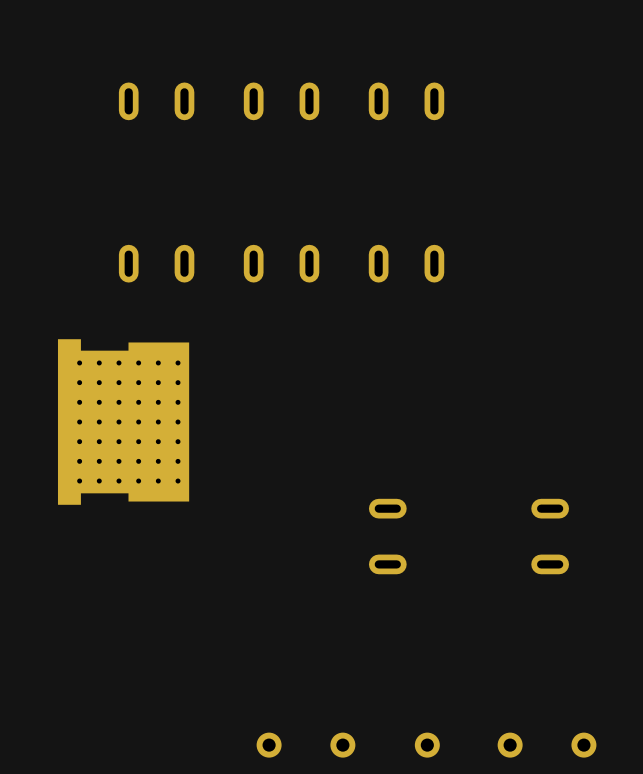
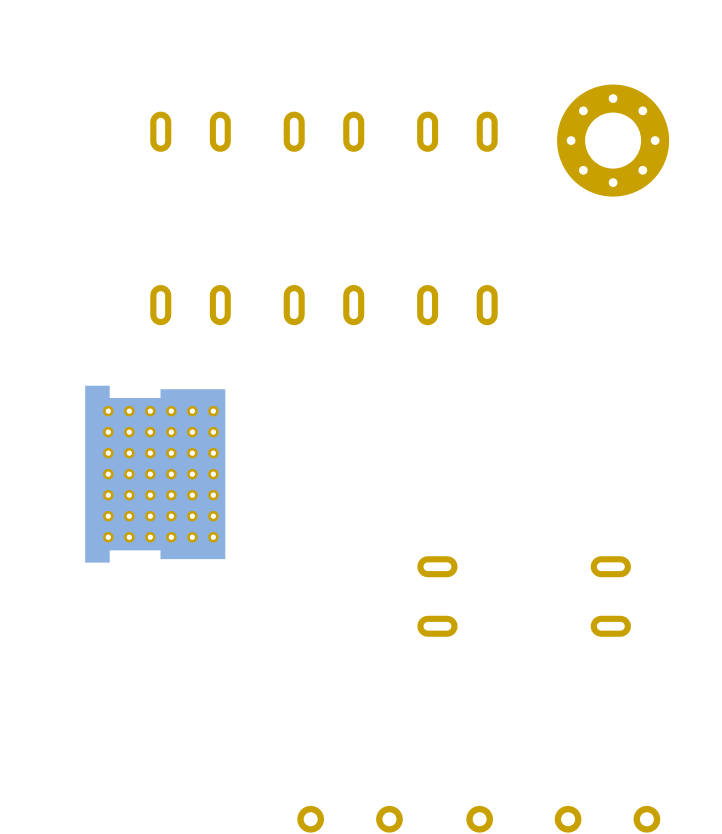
part: none -> (613, 140)

